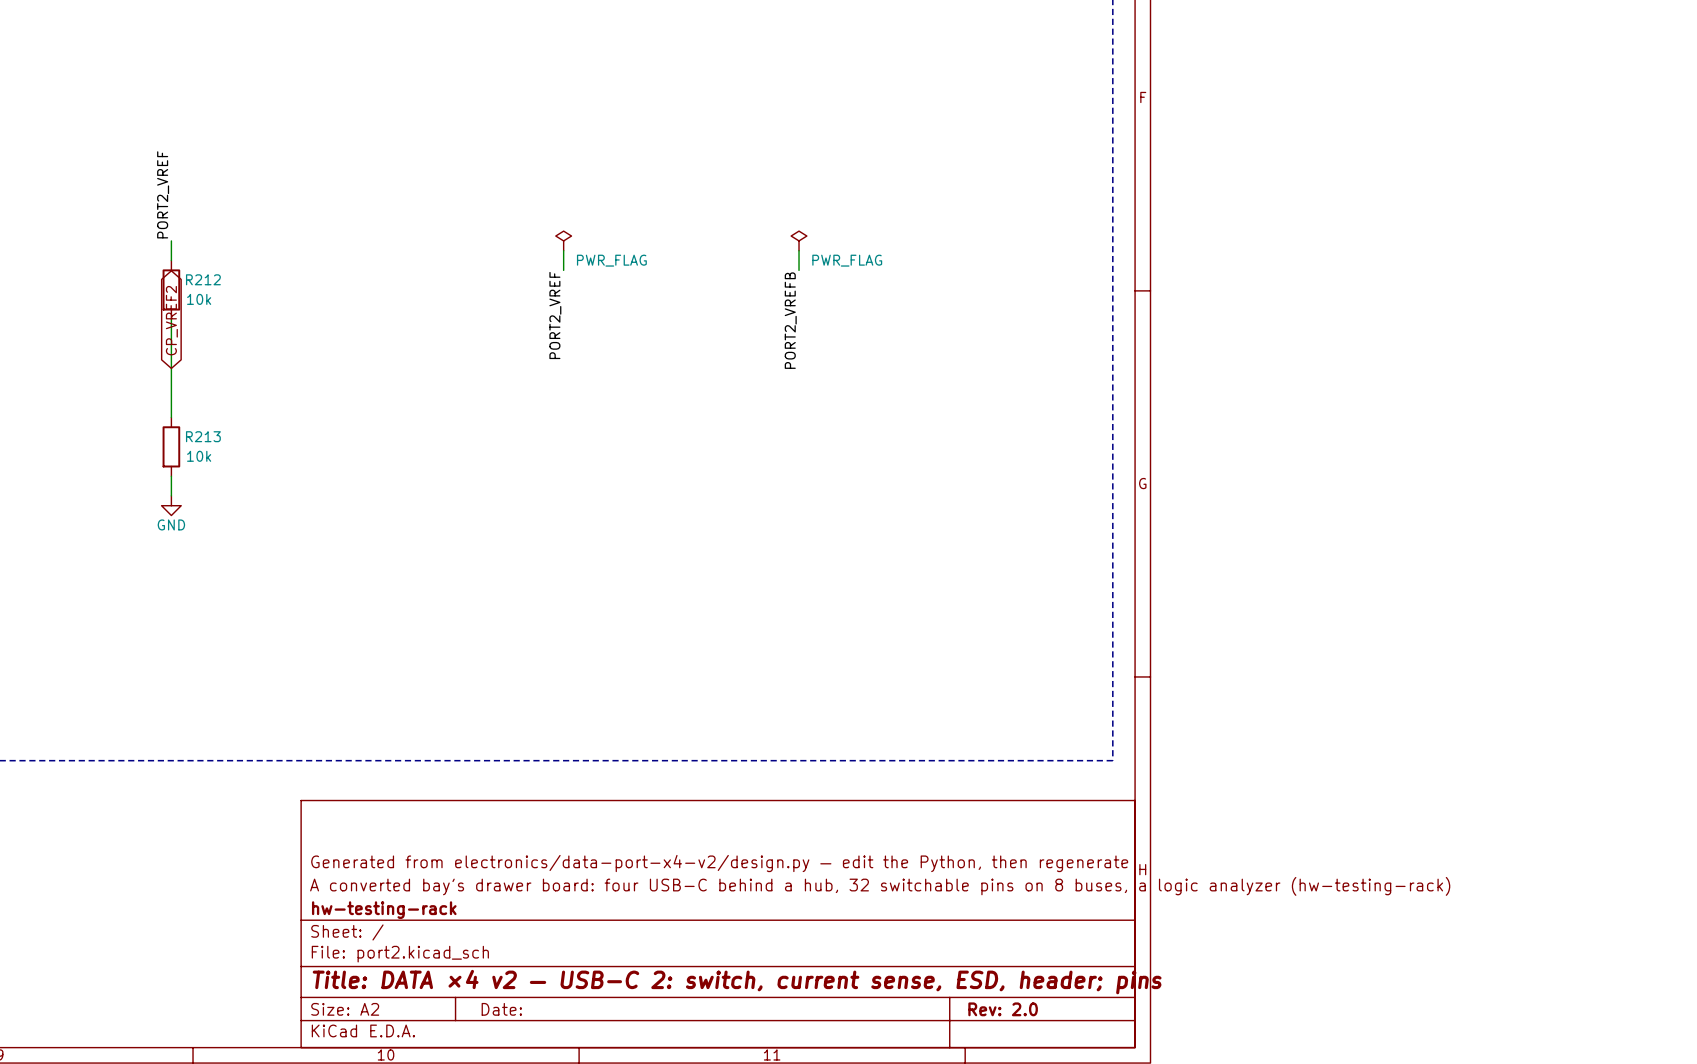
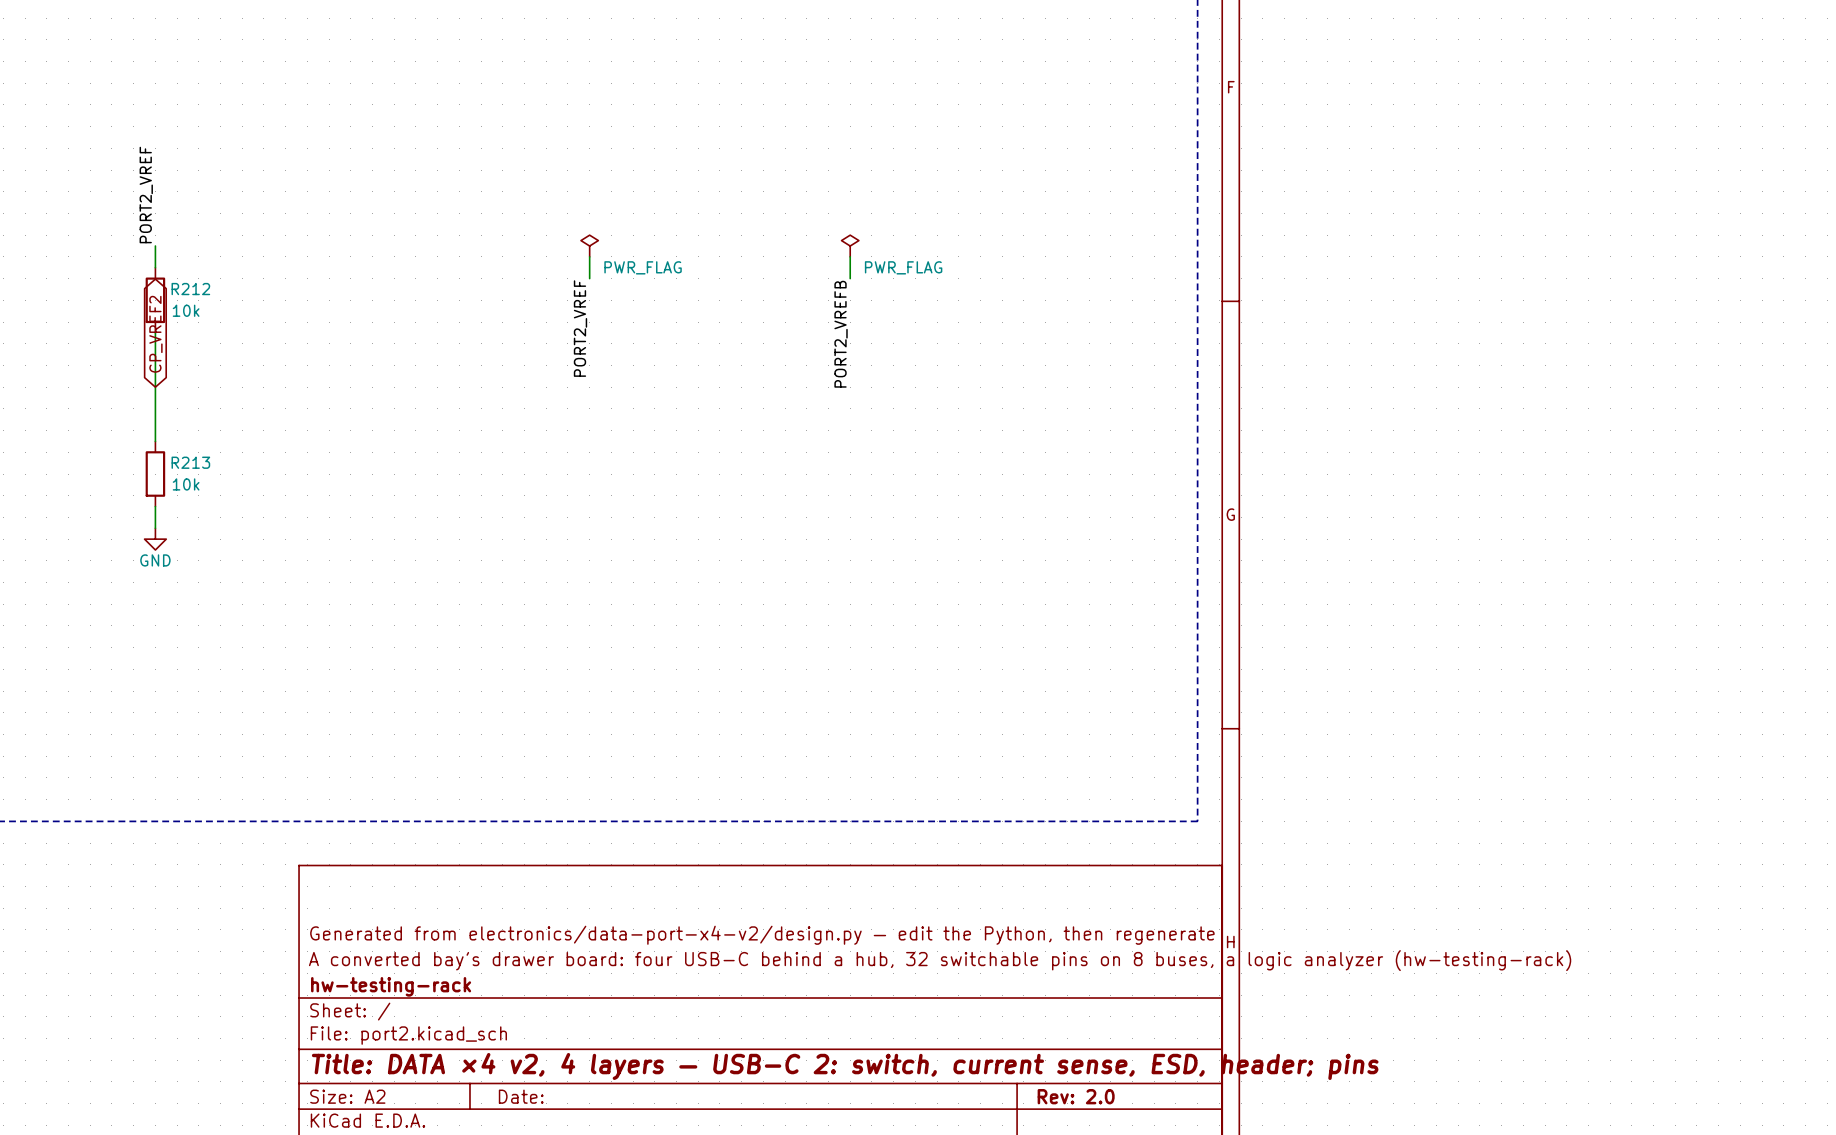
title block: Title: DATA ×4 v2 — USB-C 2: switch, current sense, ESD, header; pins (737, 982) -> Title: DATA ×4 v2, 4 layers — USB-C 2: switch, current sense, ESD, header; pins (845, 1066)

